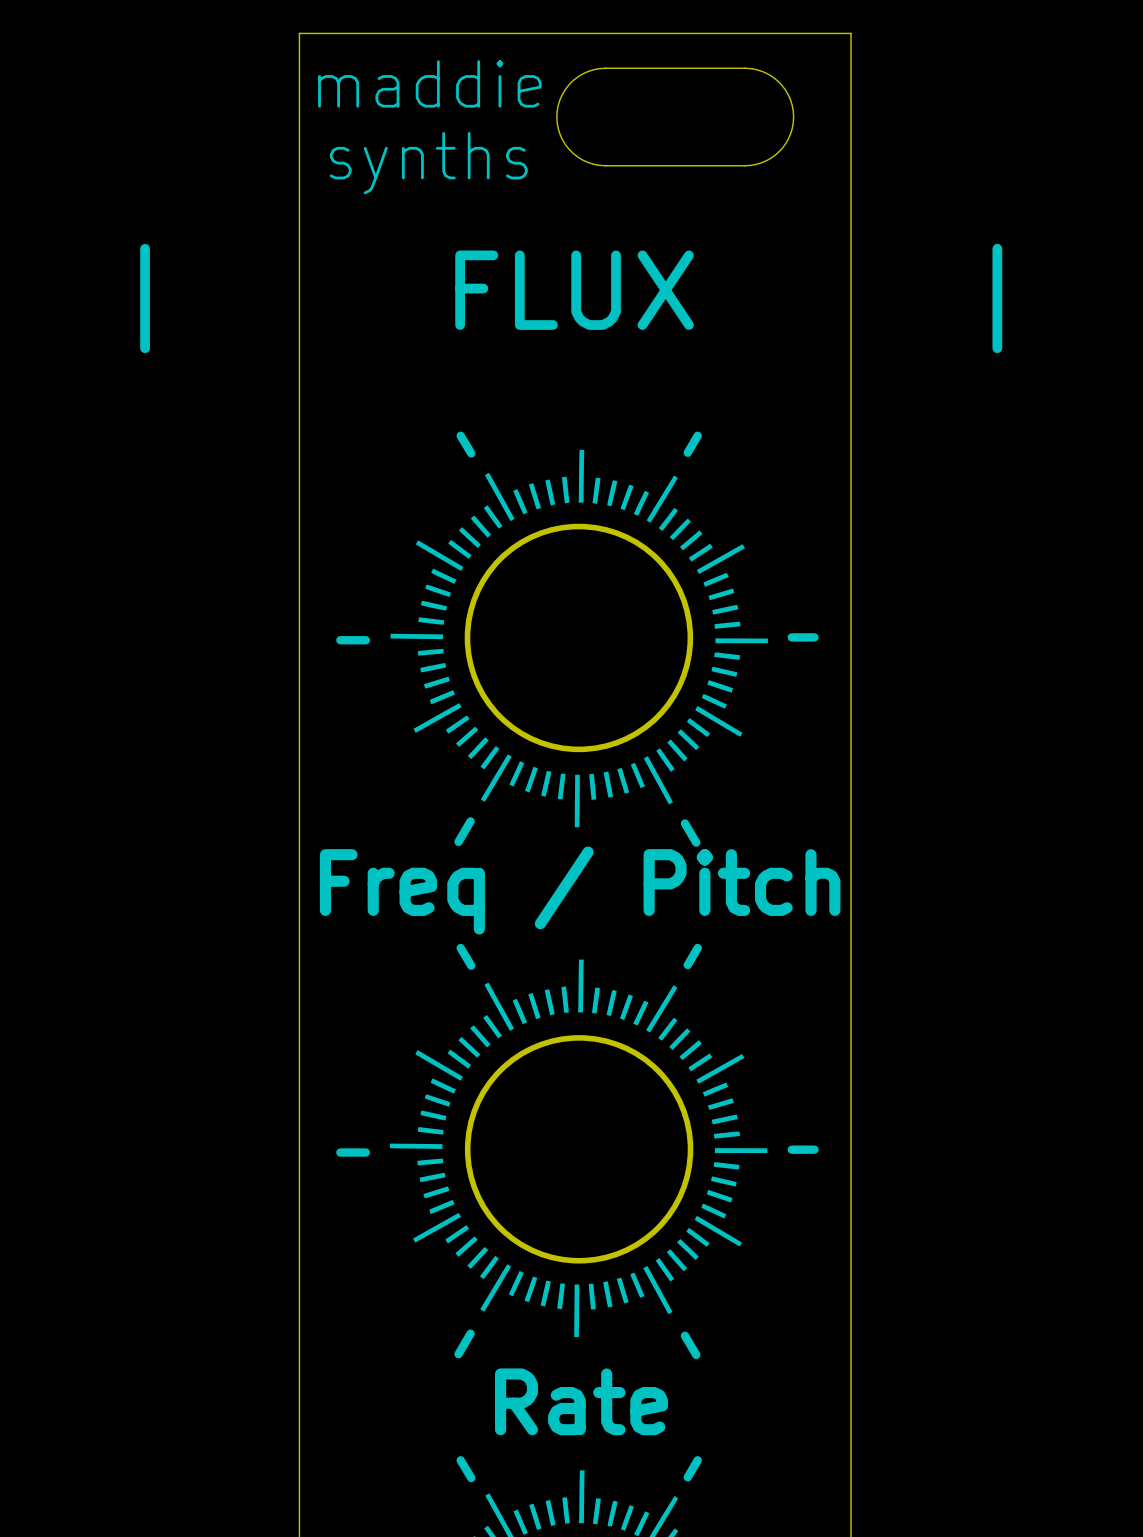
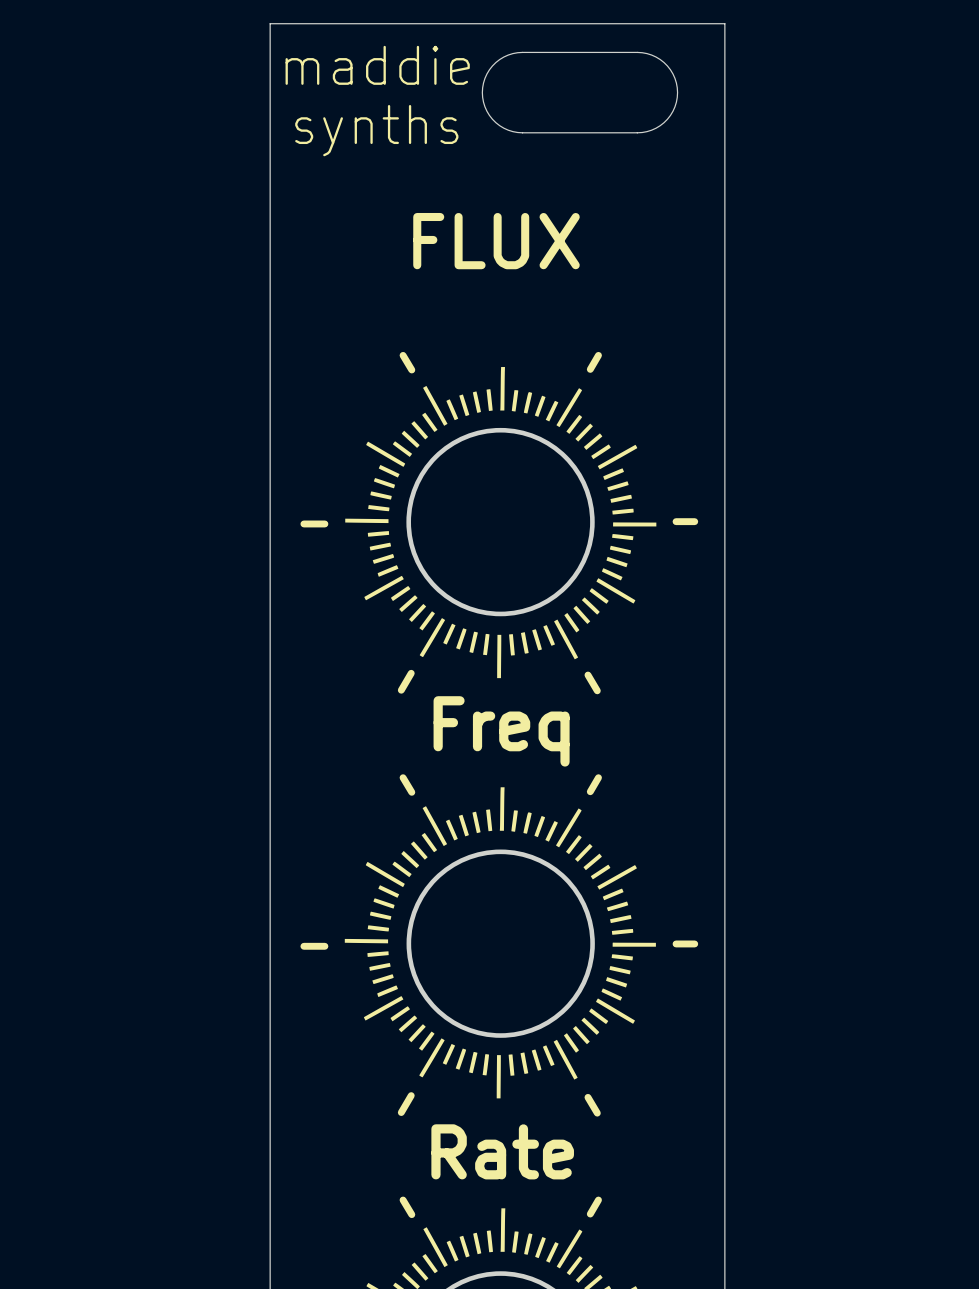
text: | FLUX | (571, 298) -> FLUX (496, 241)
text: Freq / Pitch (580, 890) -> Freq (501, 731)

